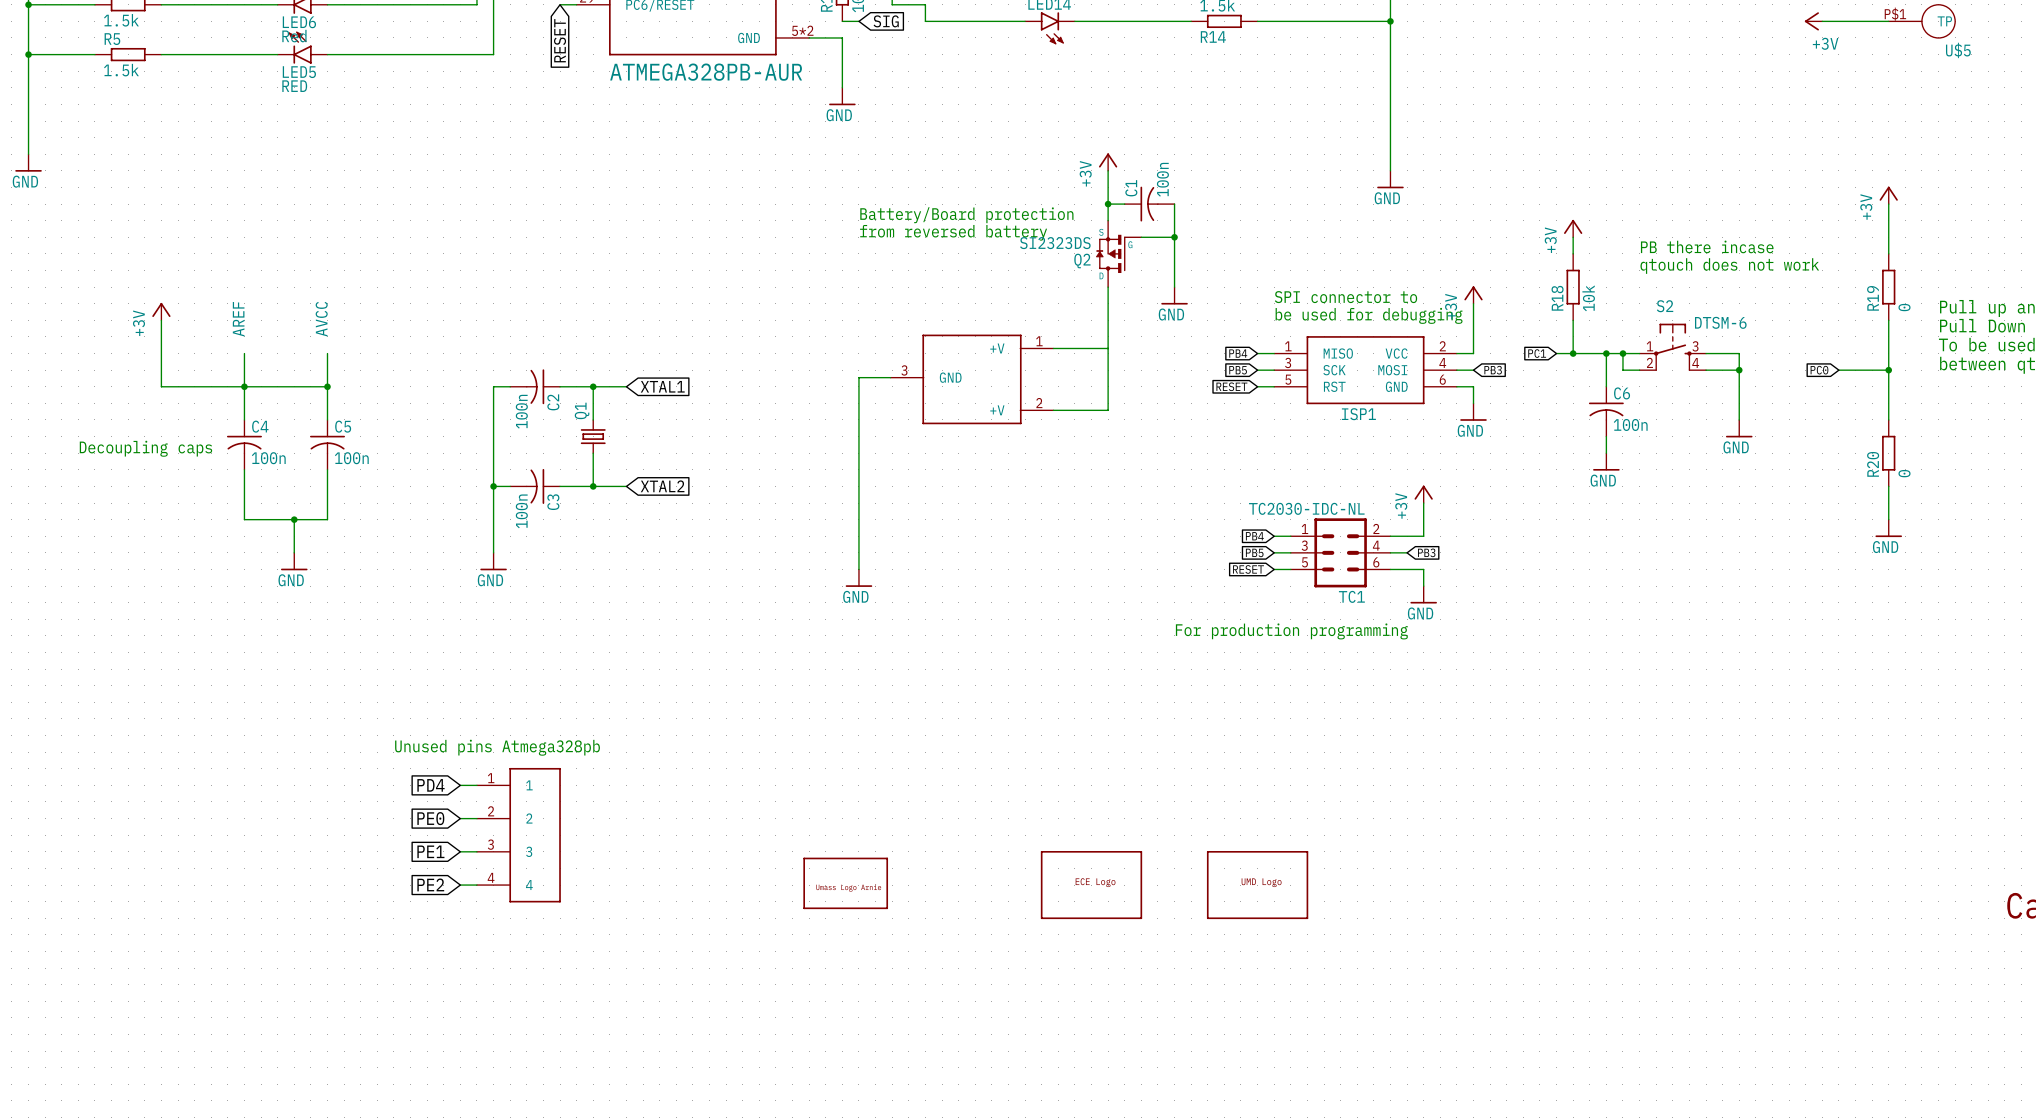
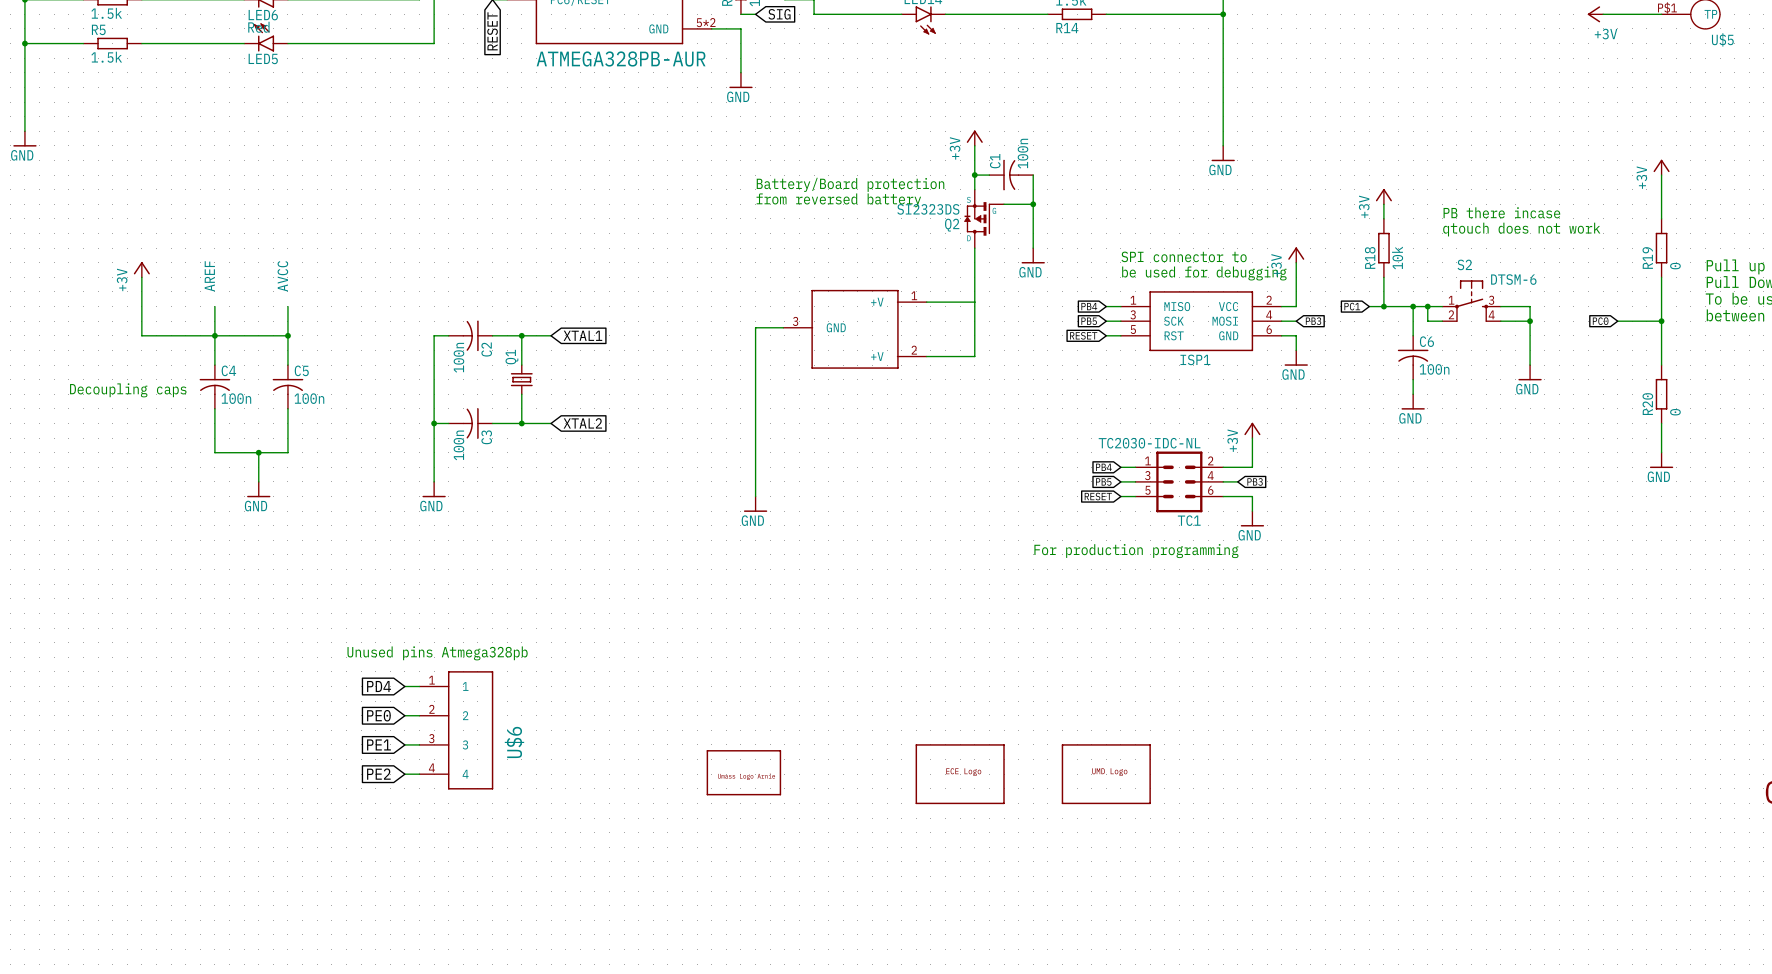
LED5 value: RED (294, 86) -> none
U$6 name: none -> U$6 (514, 742)

